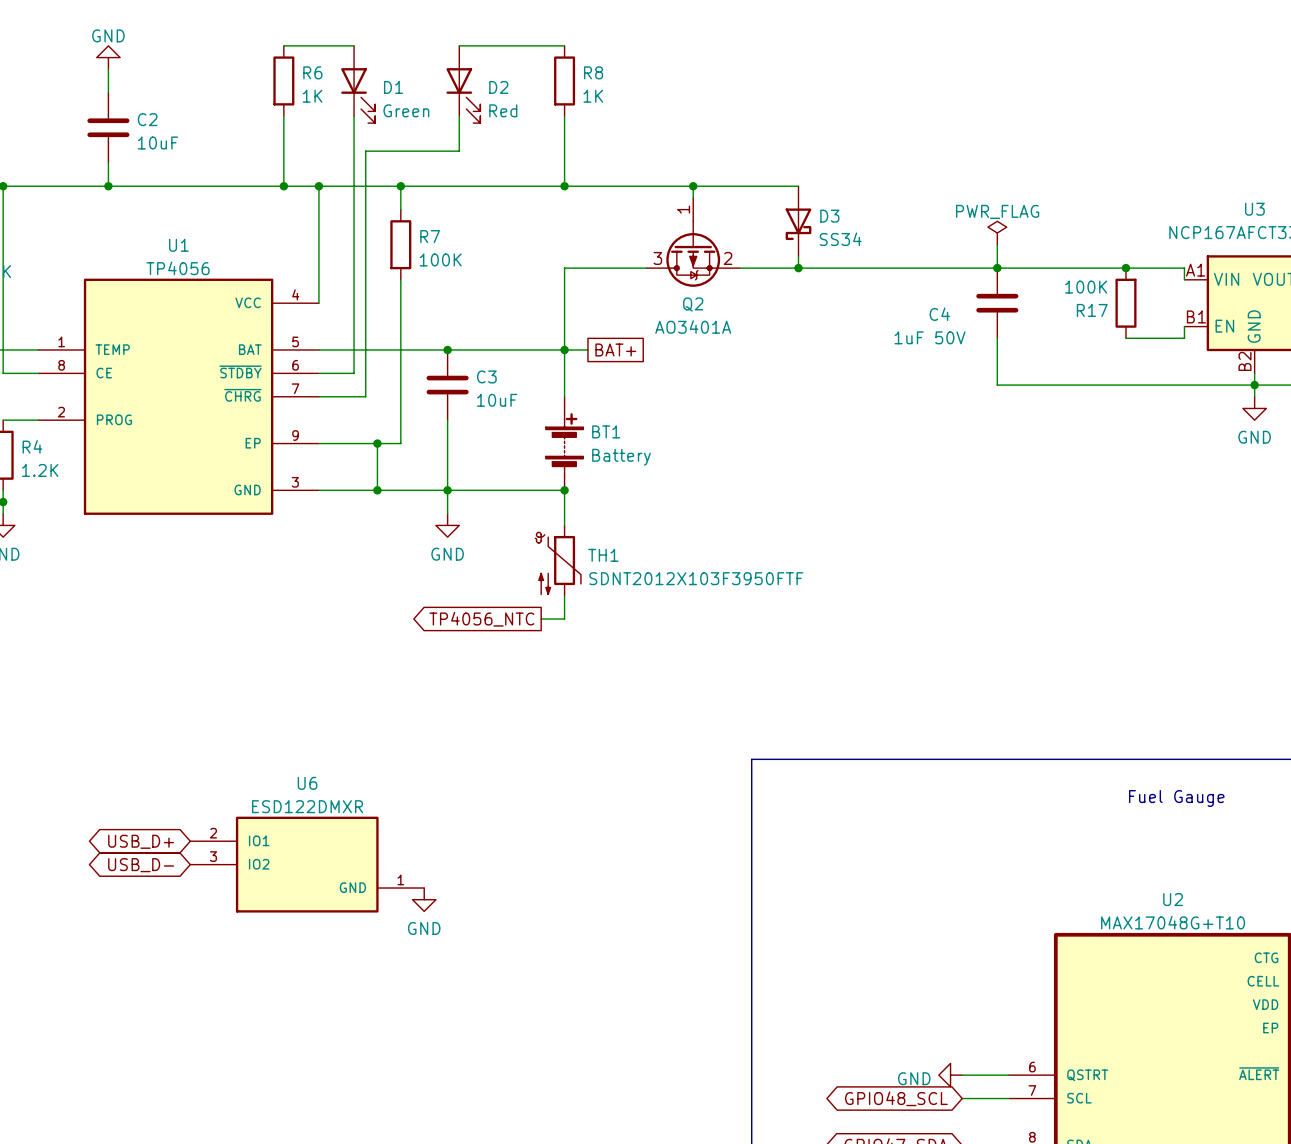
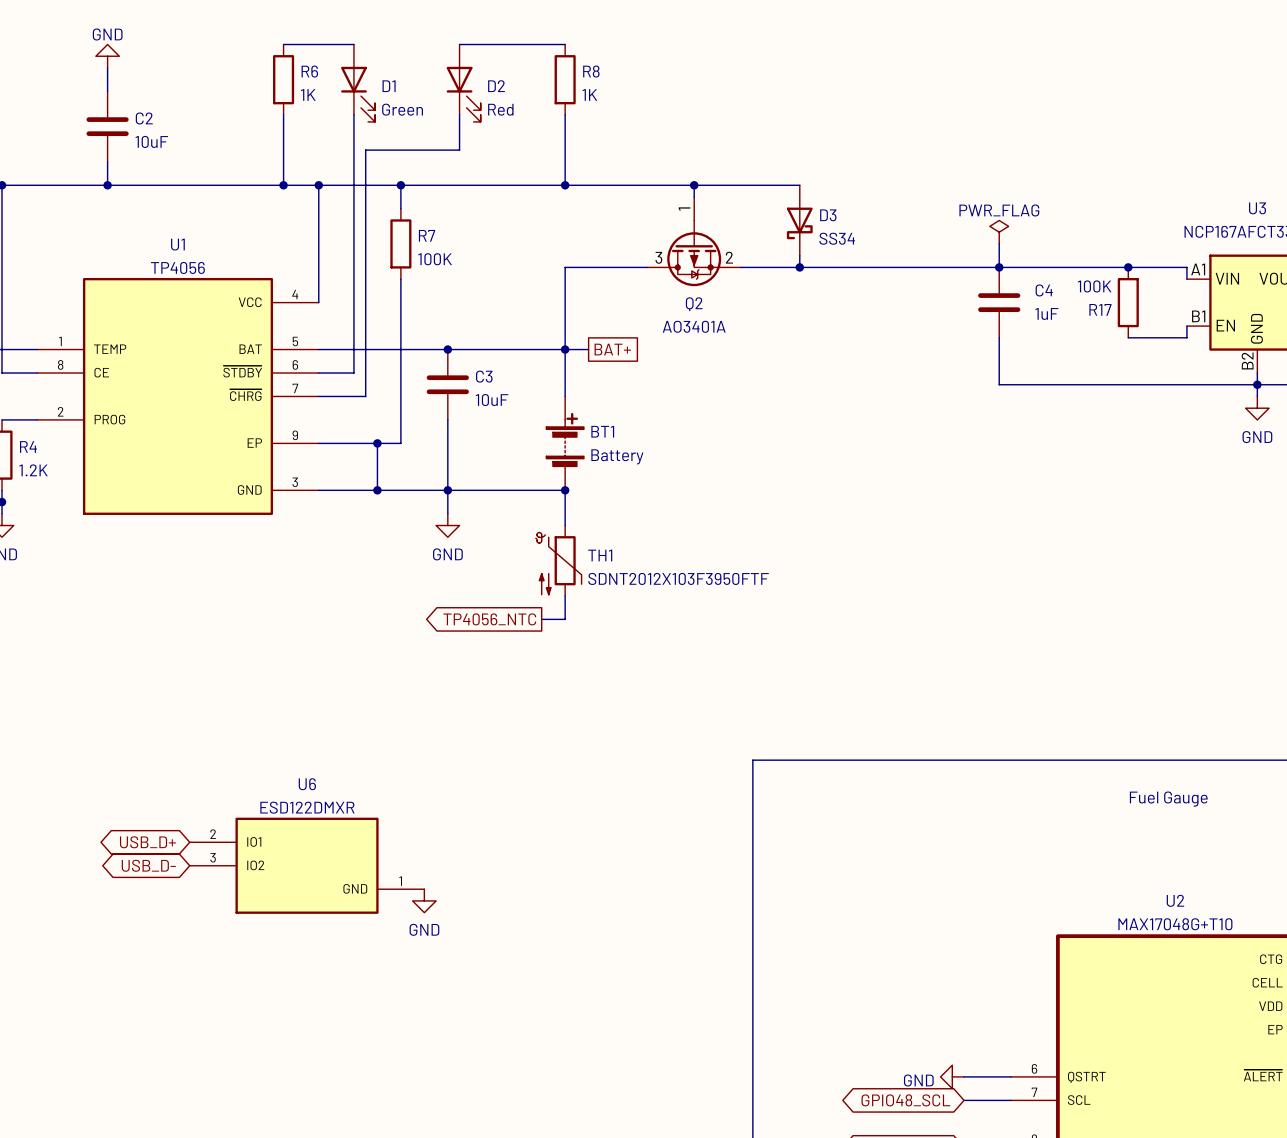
C4 name position: C4 (939, 314) -> C4 (1044, 290)
C4 value: 1uF 50V (930, 337) -> 1uF (1046, 313)

